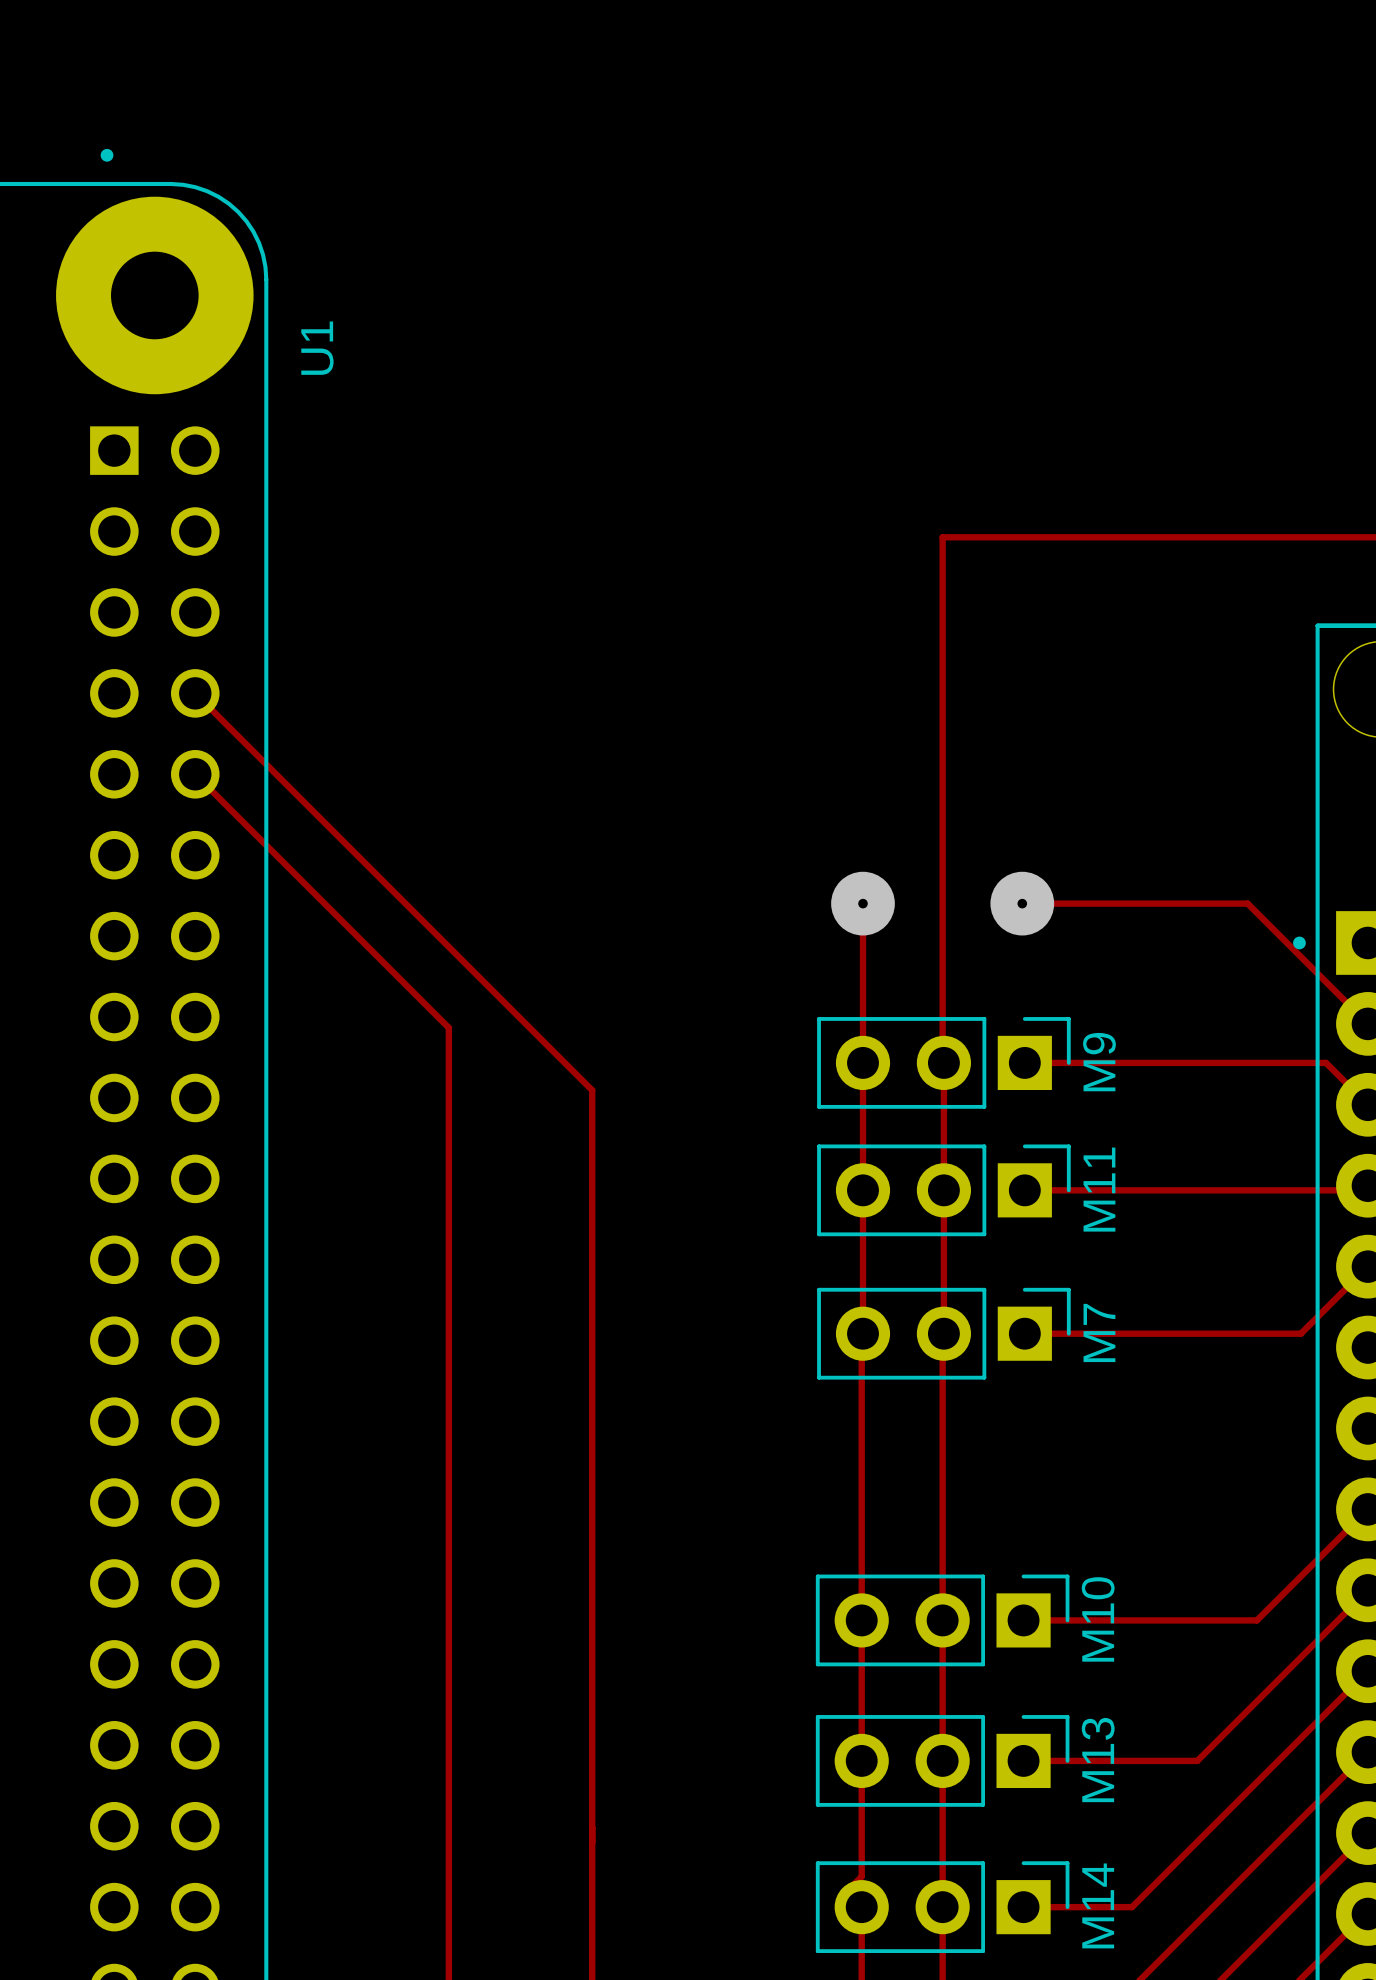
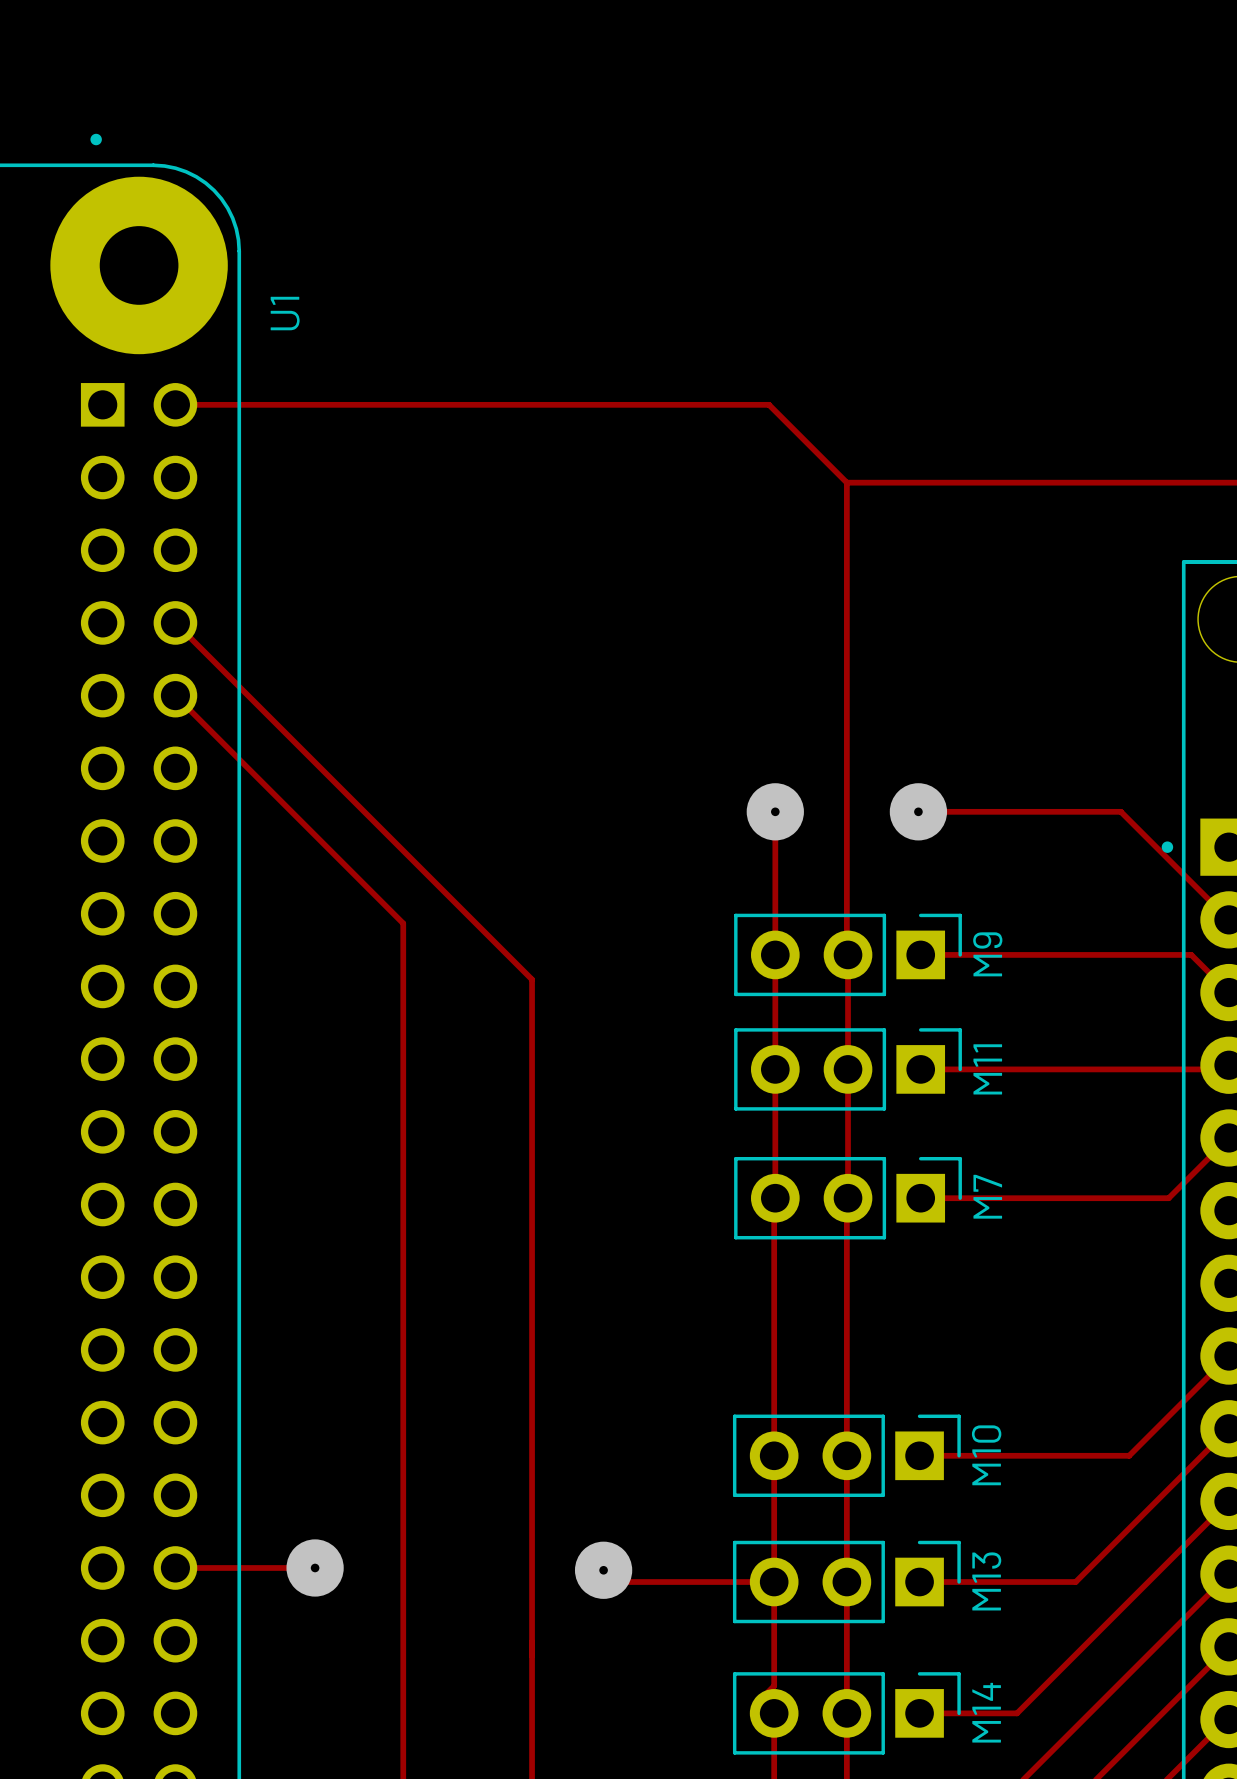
track: none -> (175, 404) (769, 404) (846, 482)
track: none -> (175, 1567) (315, 1567) (317, 1570)
via: none -> (315, 1567)
track: none -> (603, 1570) (603, 1579) (606, 1582) (774, 1582)
via: none -> (603, 1570)

